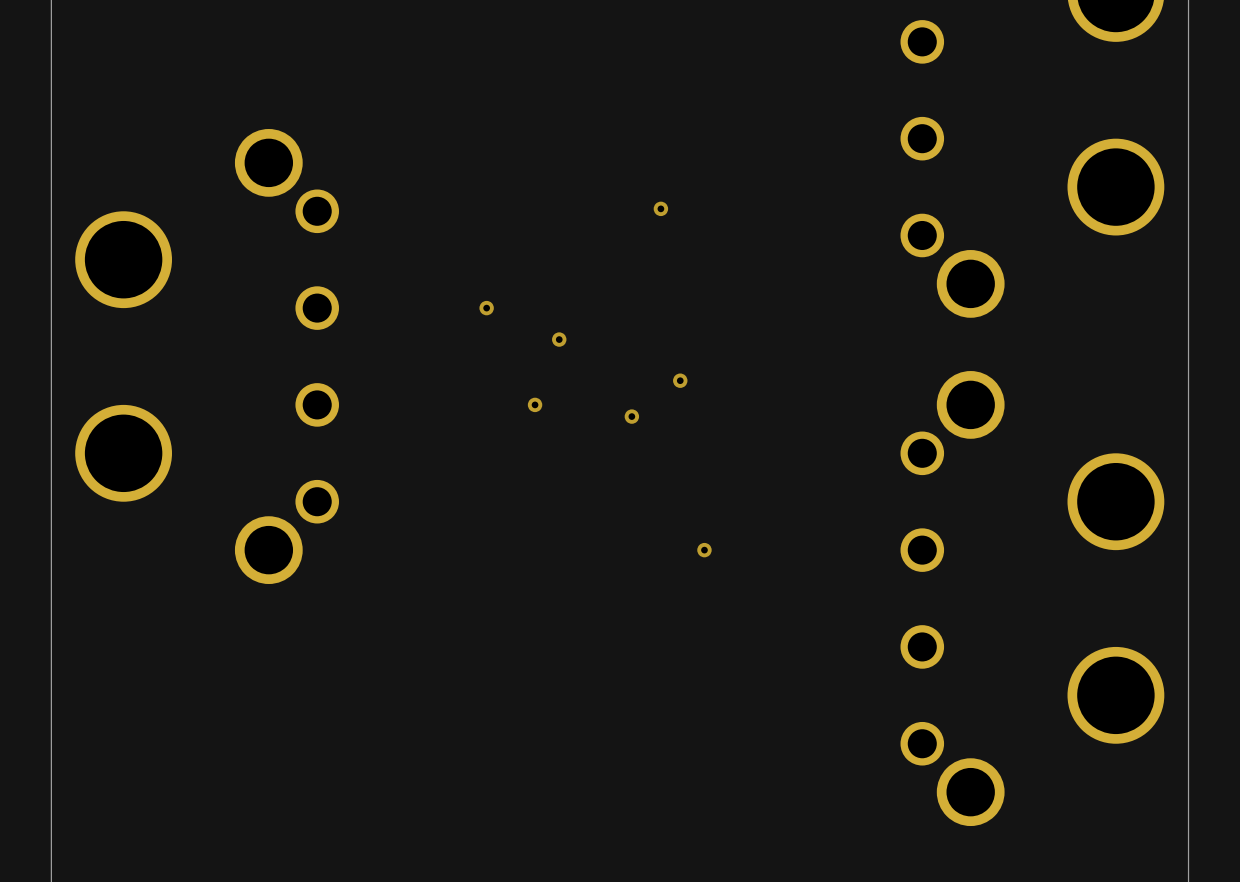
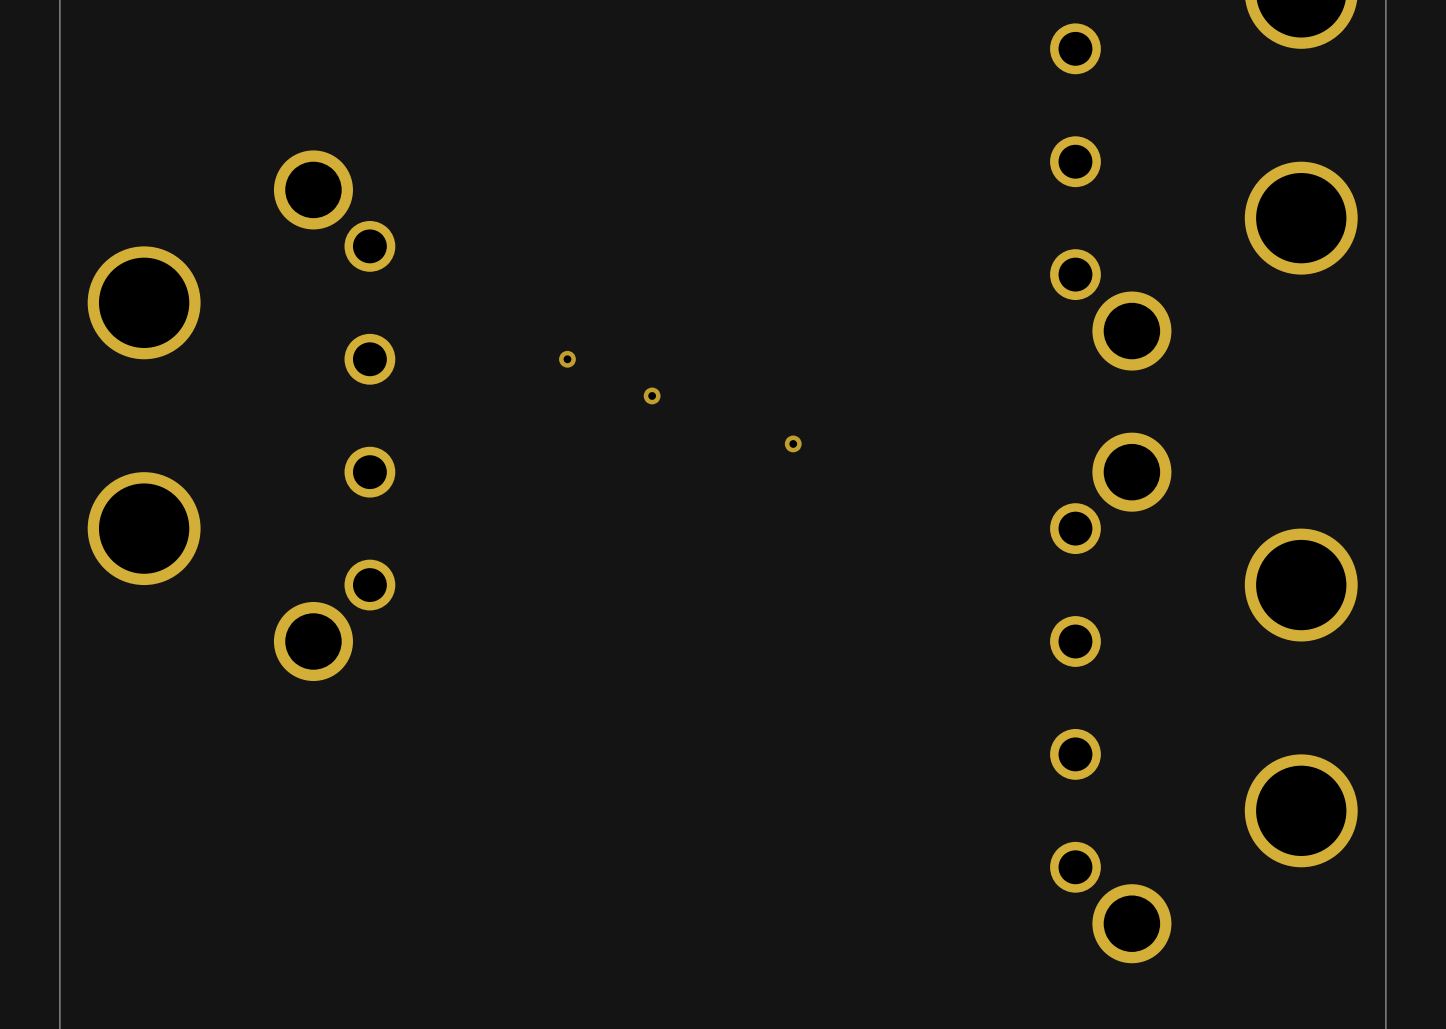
via: (660, 208) -> none
via: (535, 404) -> none
via: (631, 416) -> none
via: (704, 550) -> none

